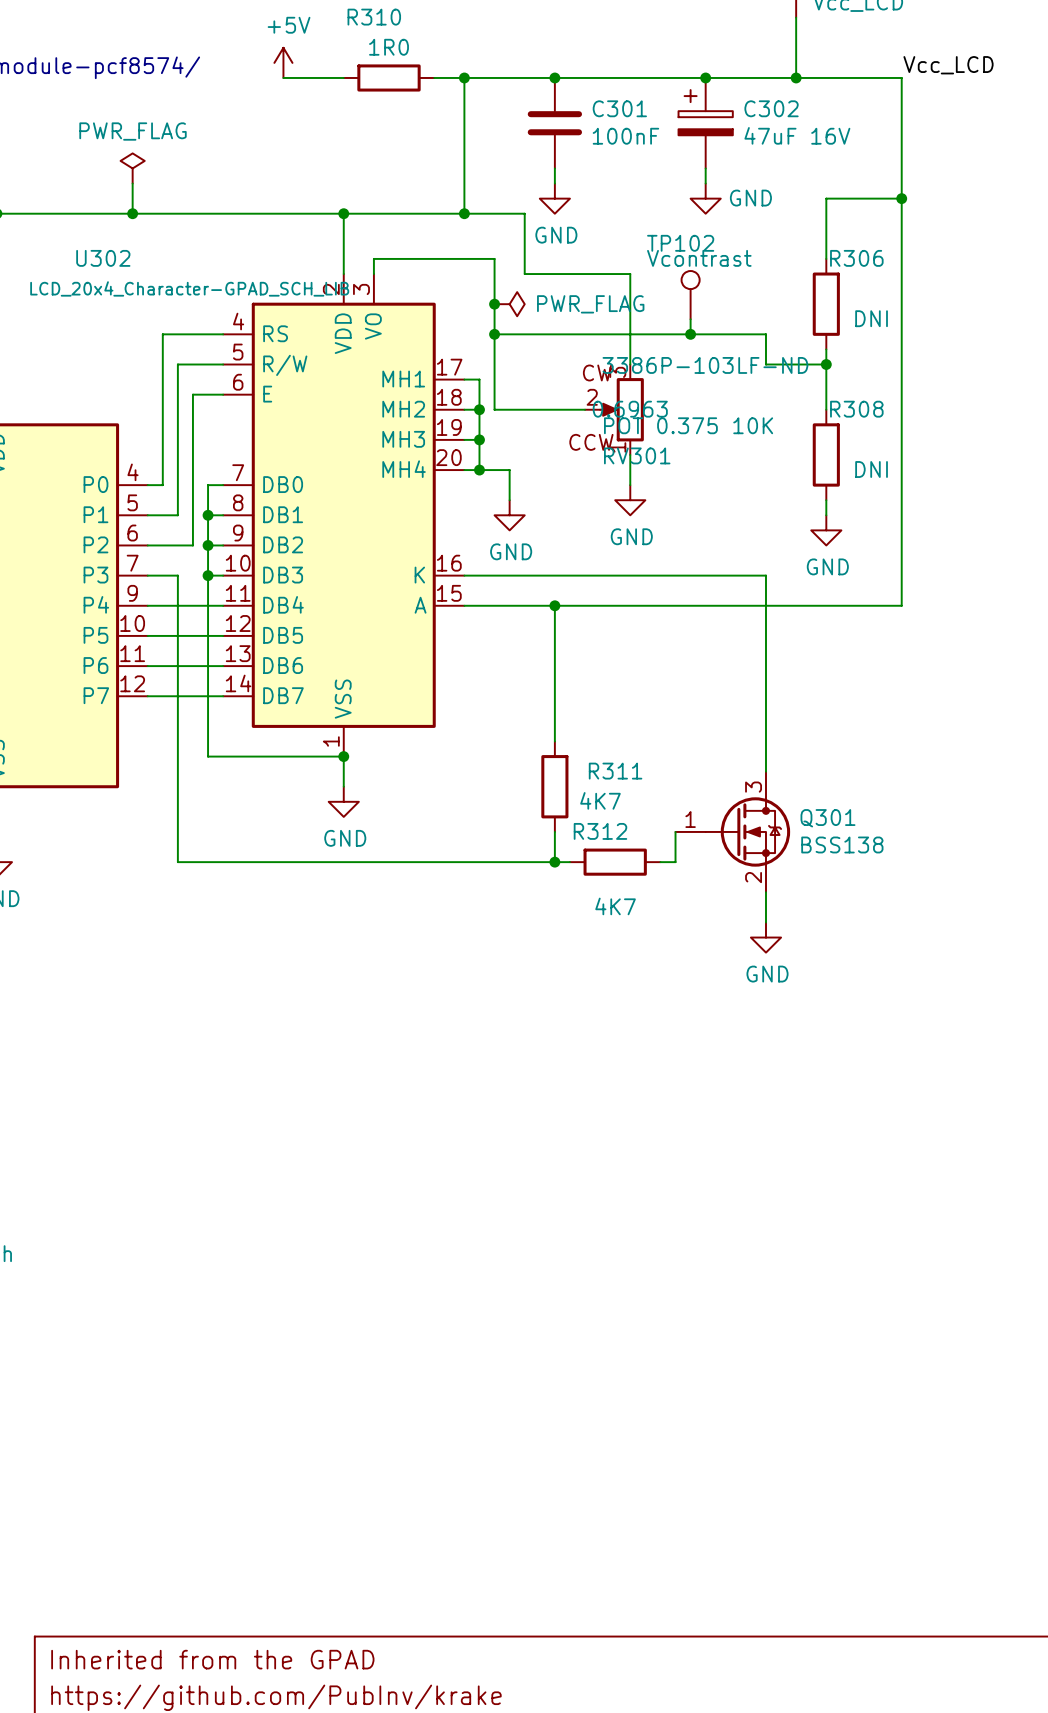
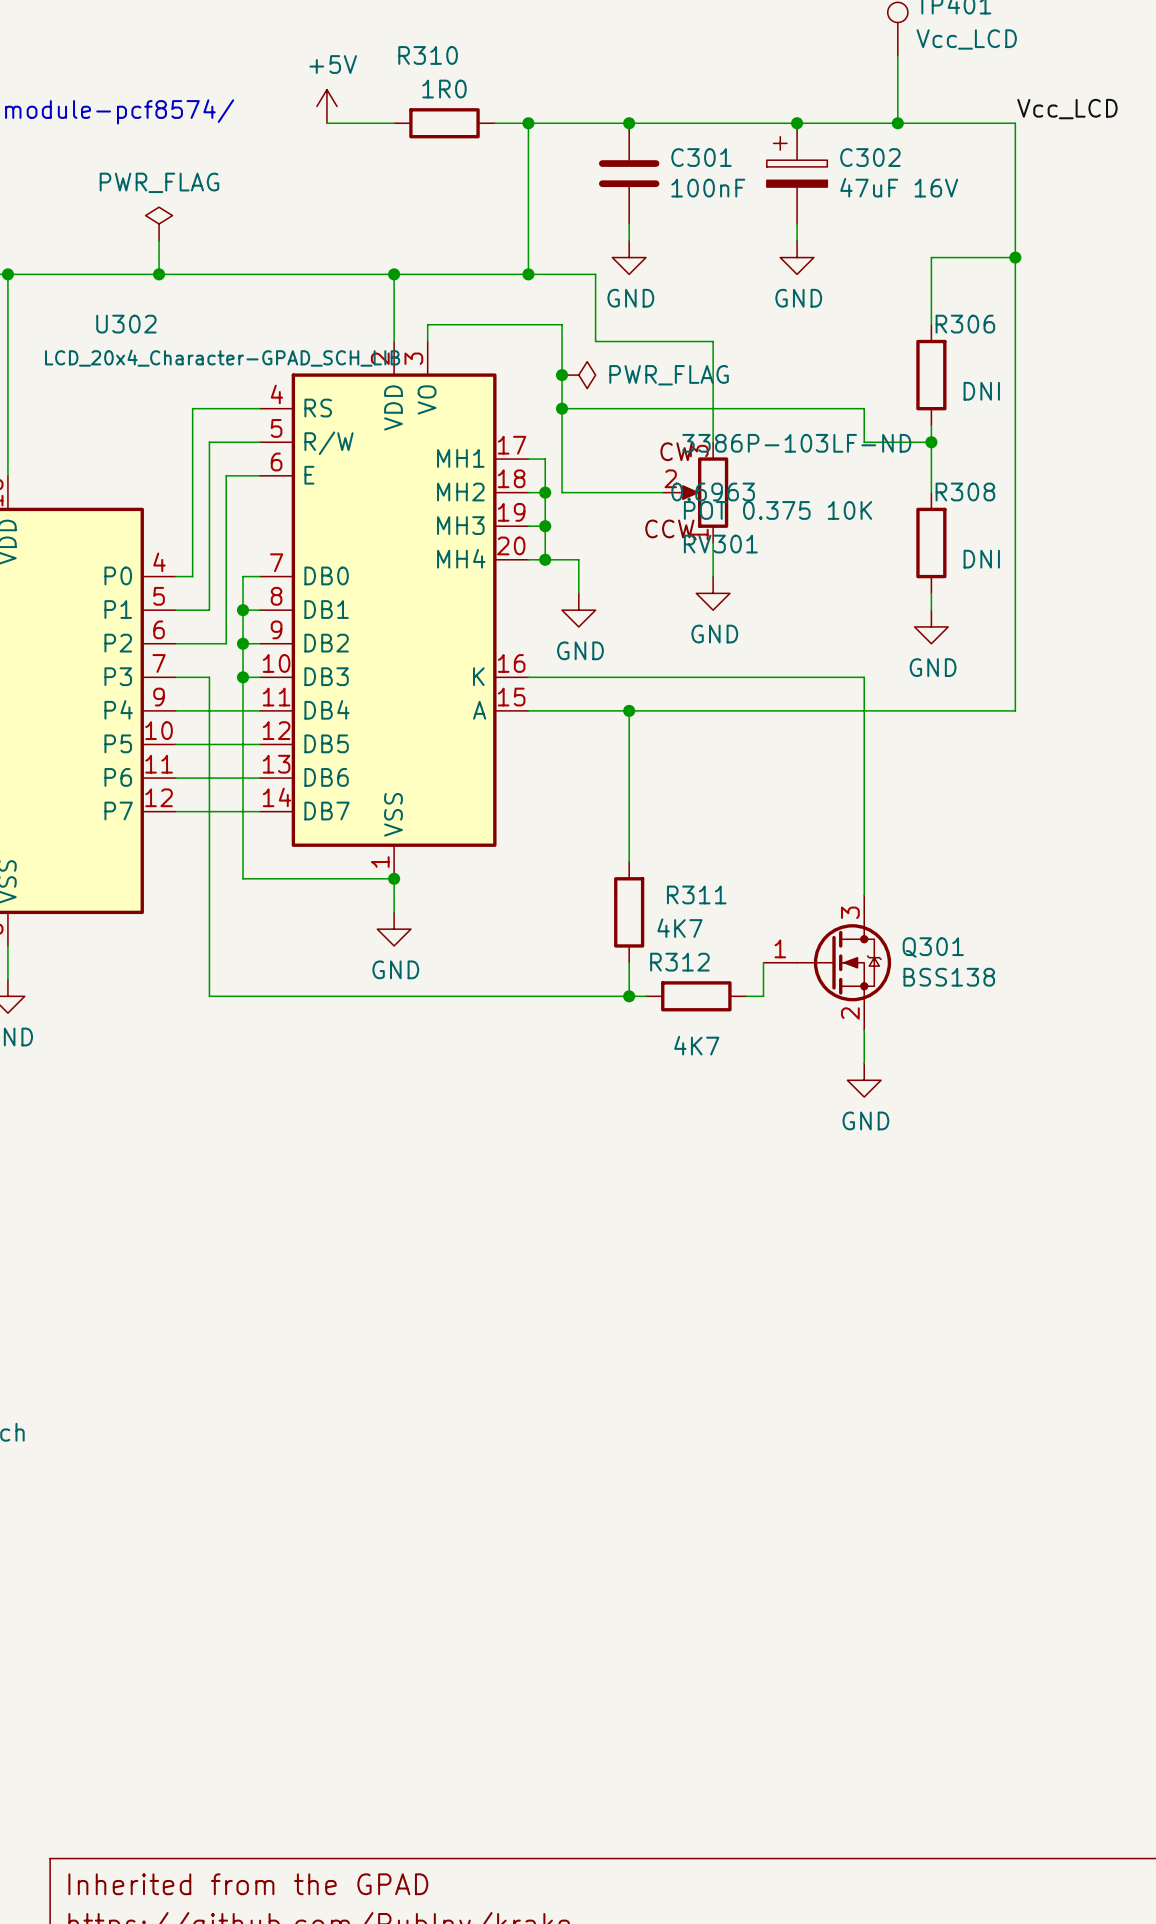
power symbol text position: GND (750, 198) -> GND (798, 298)
TP102: Vcontrast (690, 295) -> none
wire: (690, 319) (690, 334) -> none
junction: (690, 334) -> none

